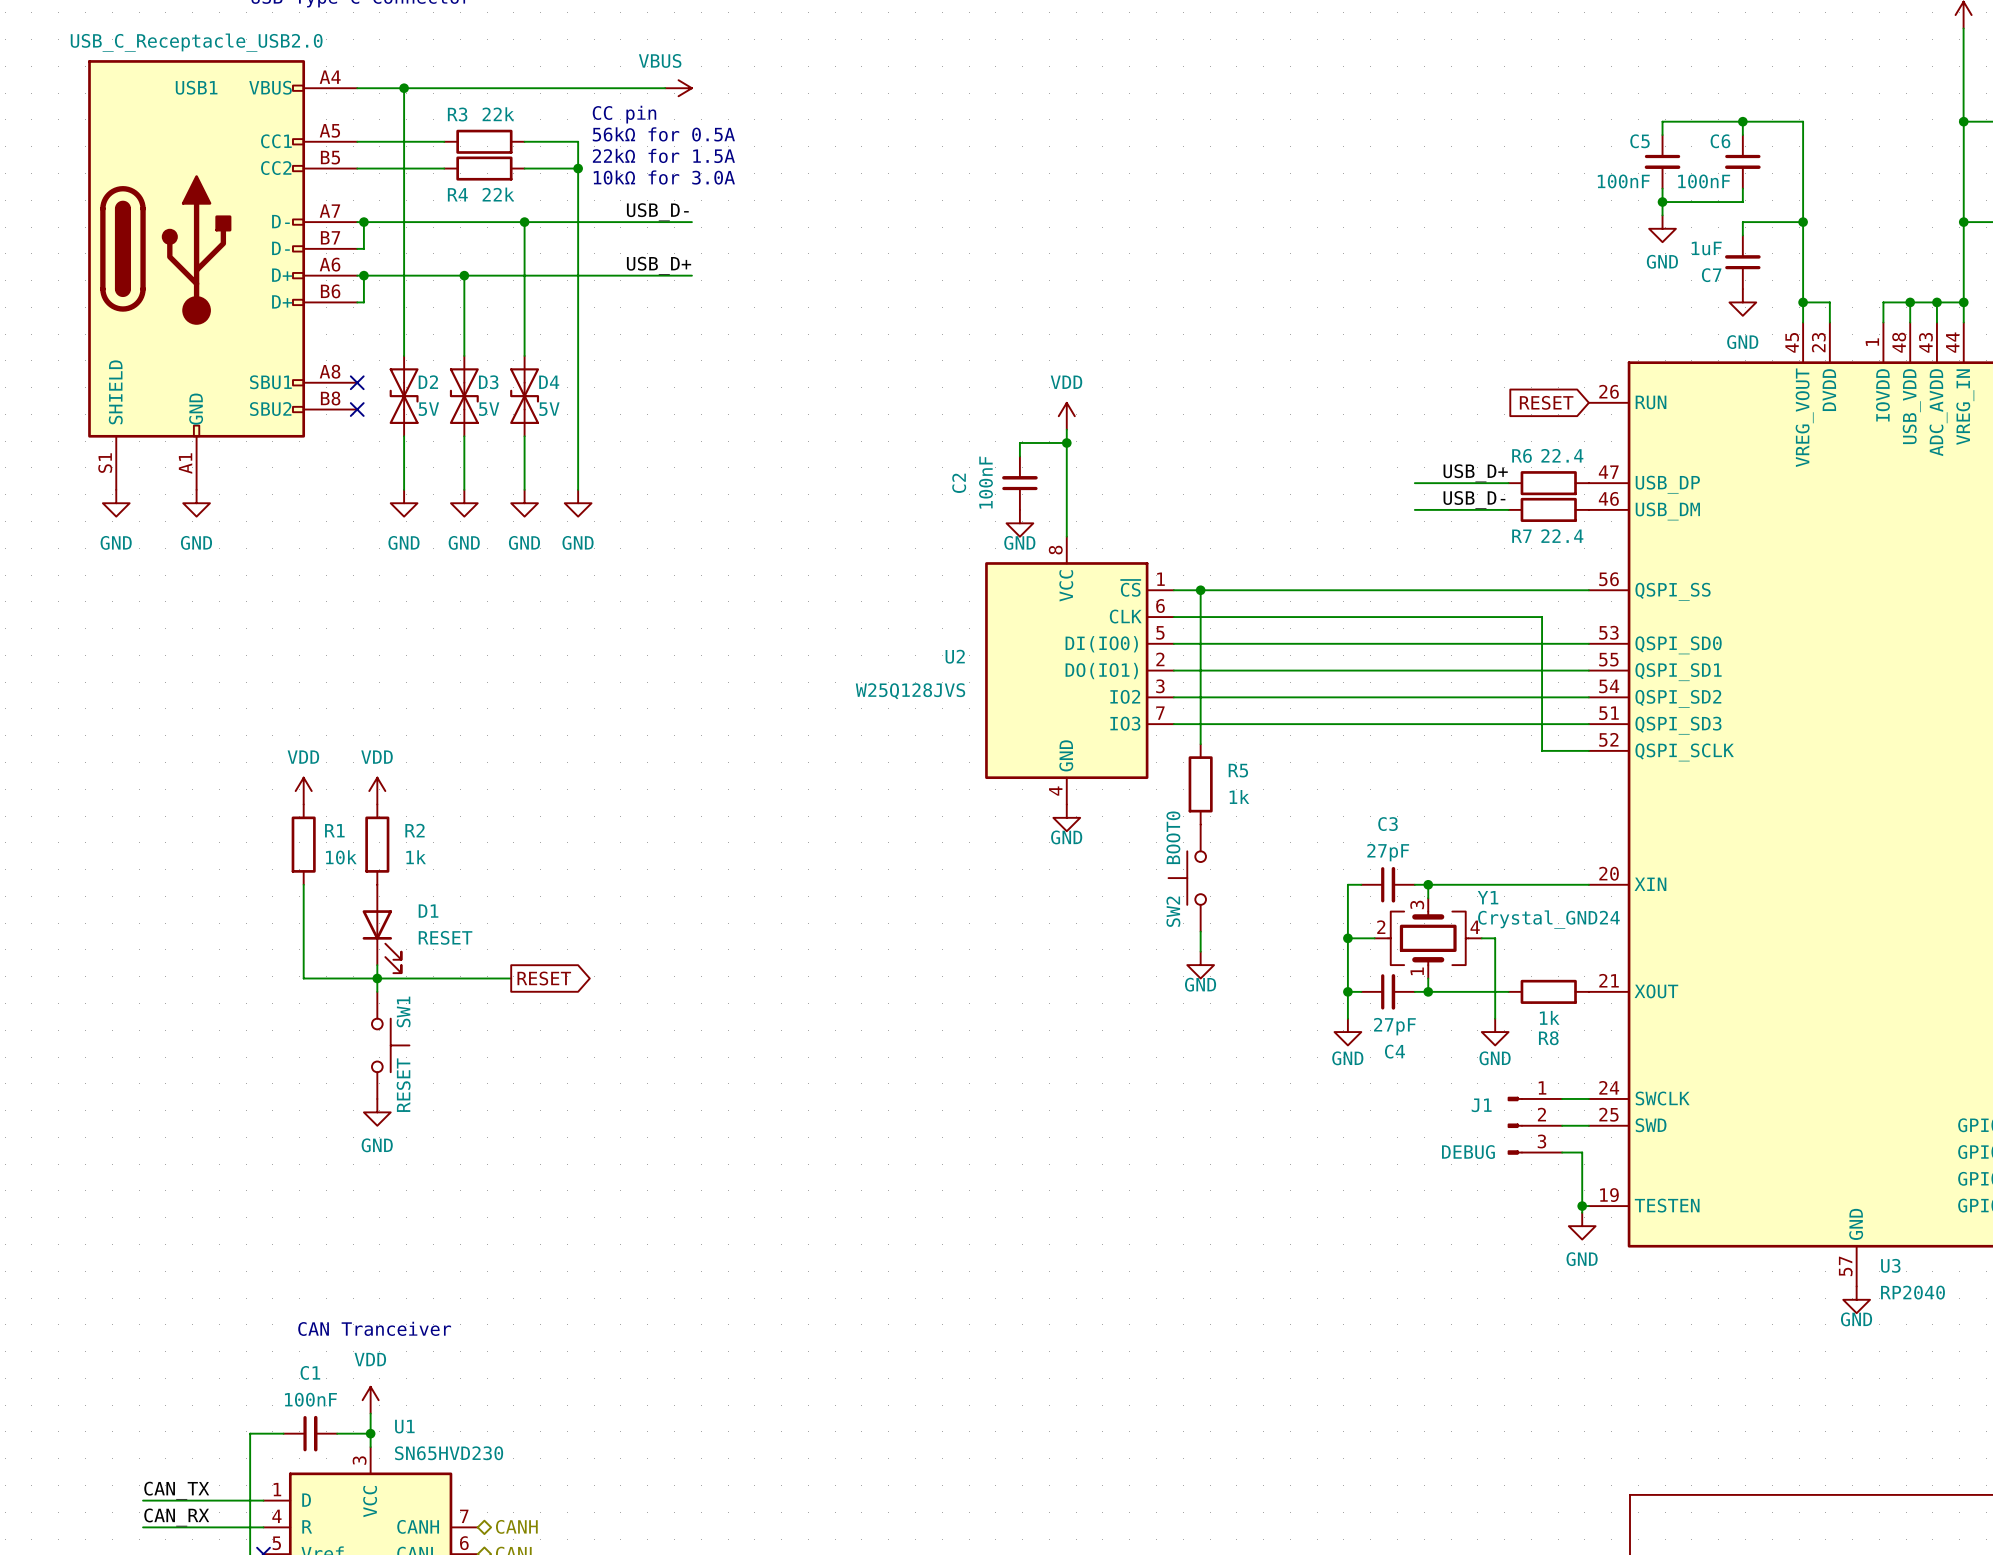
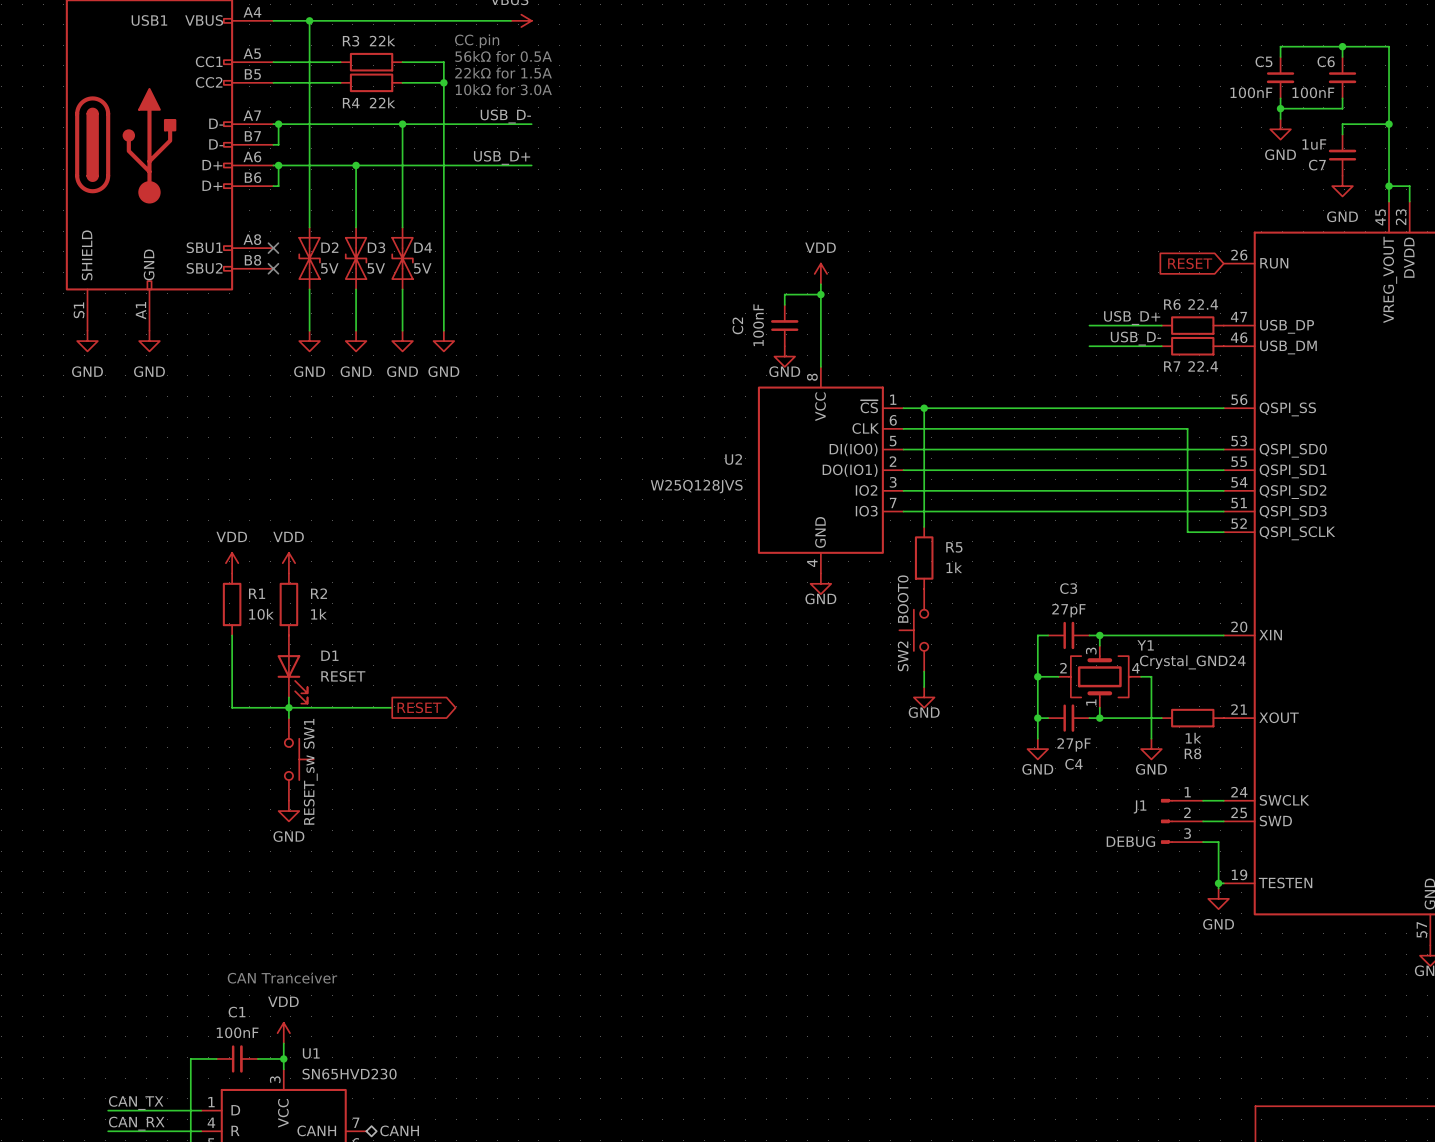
SW1 value: RESET (403, 1085) -> RESET_sw (310, 790)

